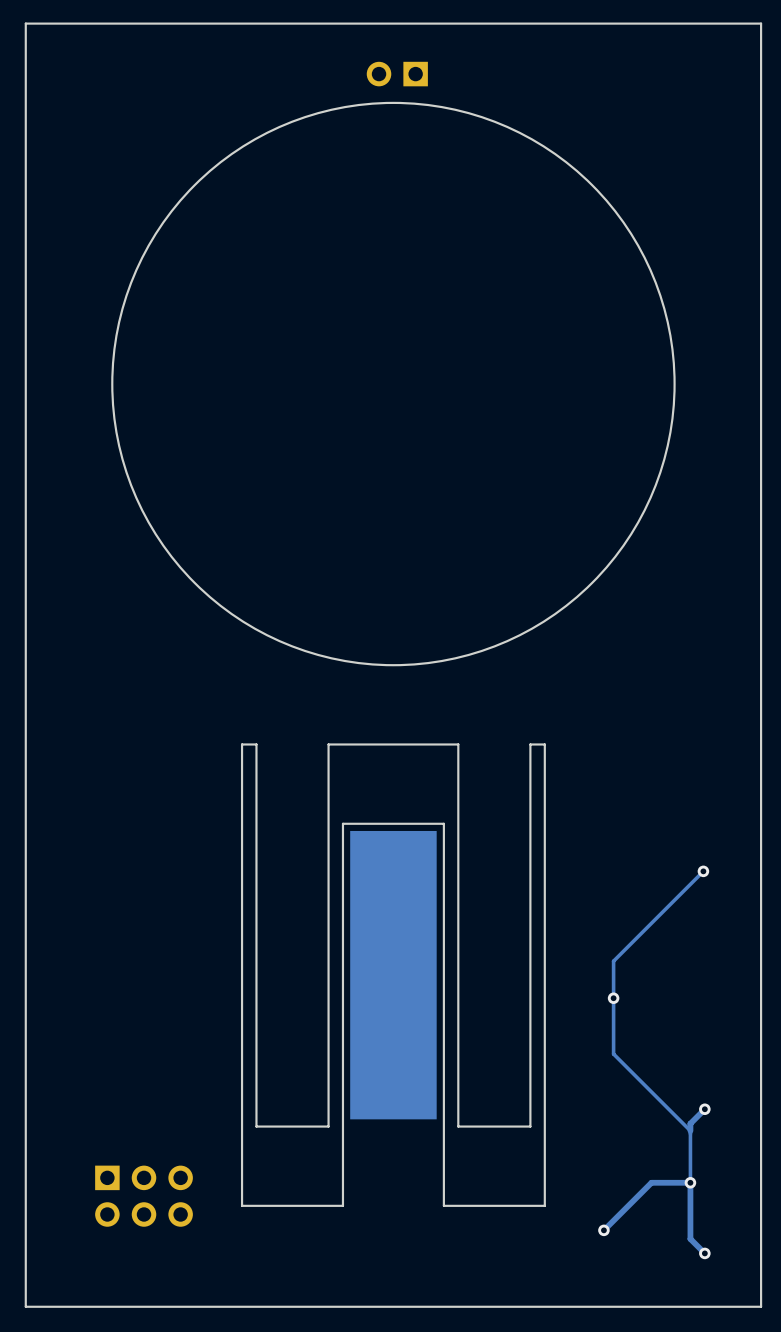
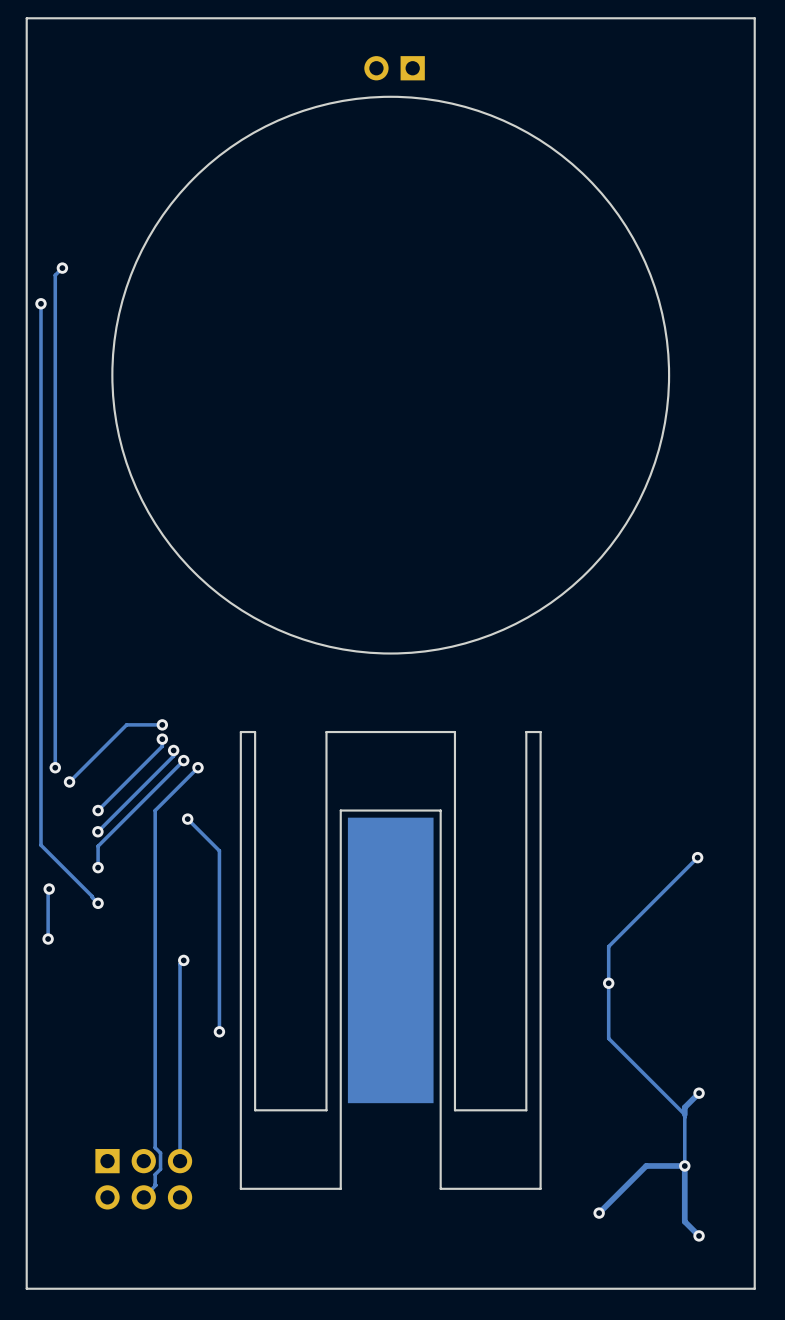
track: none -> (62, 268) (55, 275) (55, 767)
via: none -> (62, 268)
track: none -> (40, 303) (40, 845) (98, 903)
via: none -> (40, 303)
track: none -> (162, 724) (126, 724) (69, 781)
via: none -> (162, 724)
track: none -> (162, 739) (162, 746) (98, 810)
via: none -> (162, 739)
track: none -> (173, 750) (173, 756) (97, 831)
via: none -> (173, 750)
track: none -> (183, 760) (98, 846) (98, 867)
via: none -> (183, 760)
via: none -> (55, 767)
track: none -> (198, 767) (155, 810) (155, 1147) (160, 1153) (160, 1169) (155, 1174) (155, 1185) (143, 1197)
via: none -> (198, 767)
via: none -> (69, 781)
via: none -> (98, 810)
track: none -> (187, 819) (219, 850) (219, 1031)
via: none -> (187, 819)
via: none -> (97, 831)
via: none -> (98, 867)
track: none -> (49, 889) (48, 939)
via: none -> (49, 889)
via: none -> (98, 903)
via: none -> (48, 939)
track: none -> (183, 960) (180, 964) (180, 1161)
via: none -> (183, 960)
via: none -> (219, 1031)

